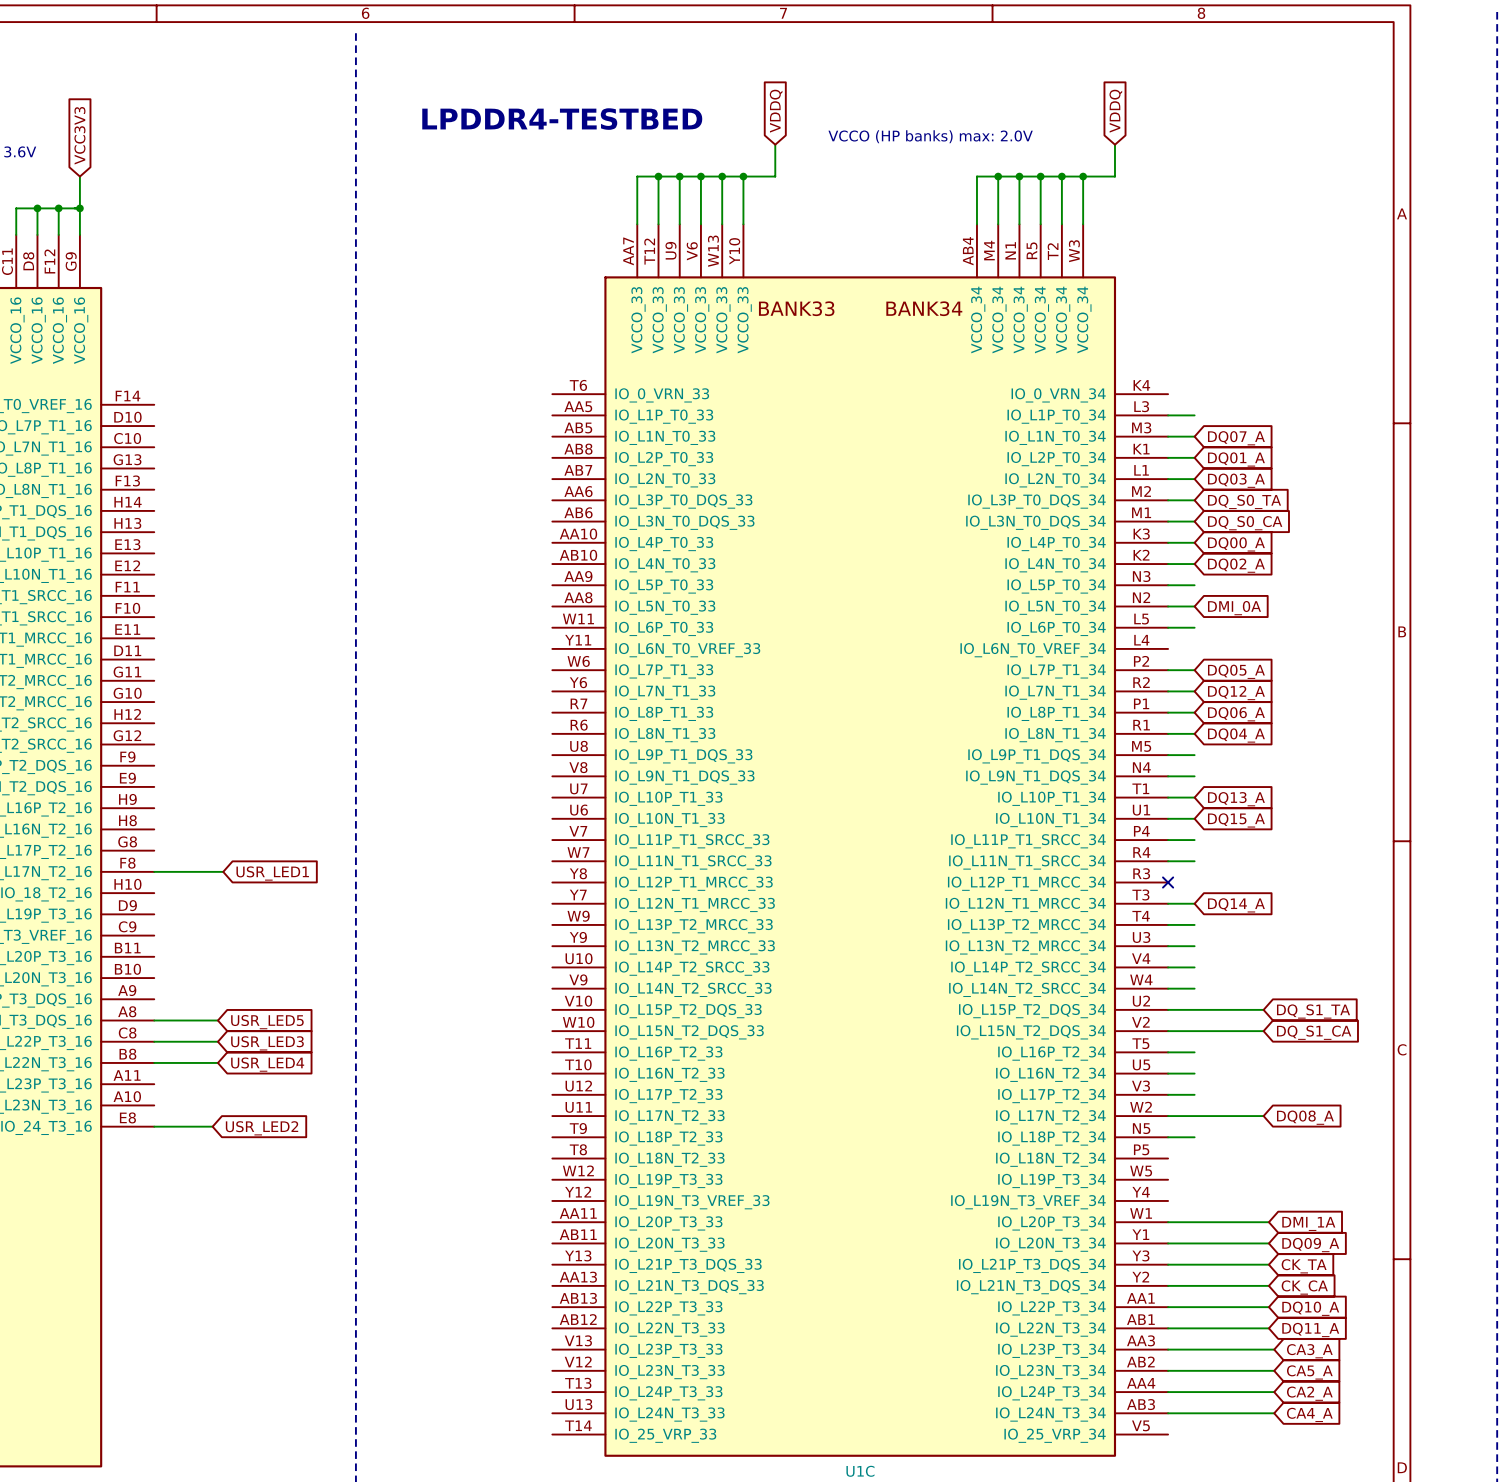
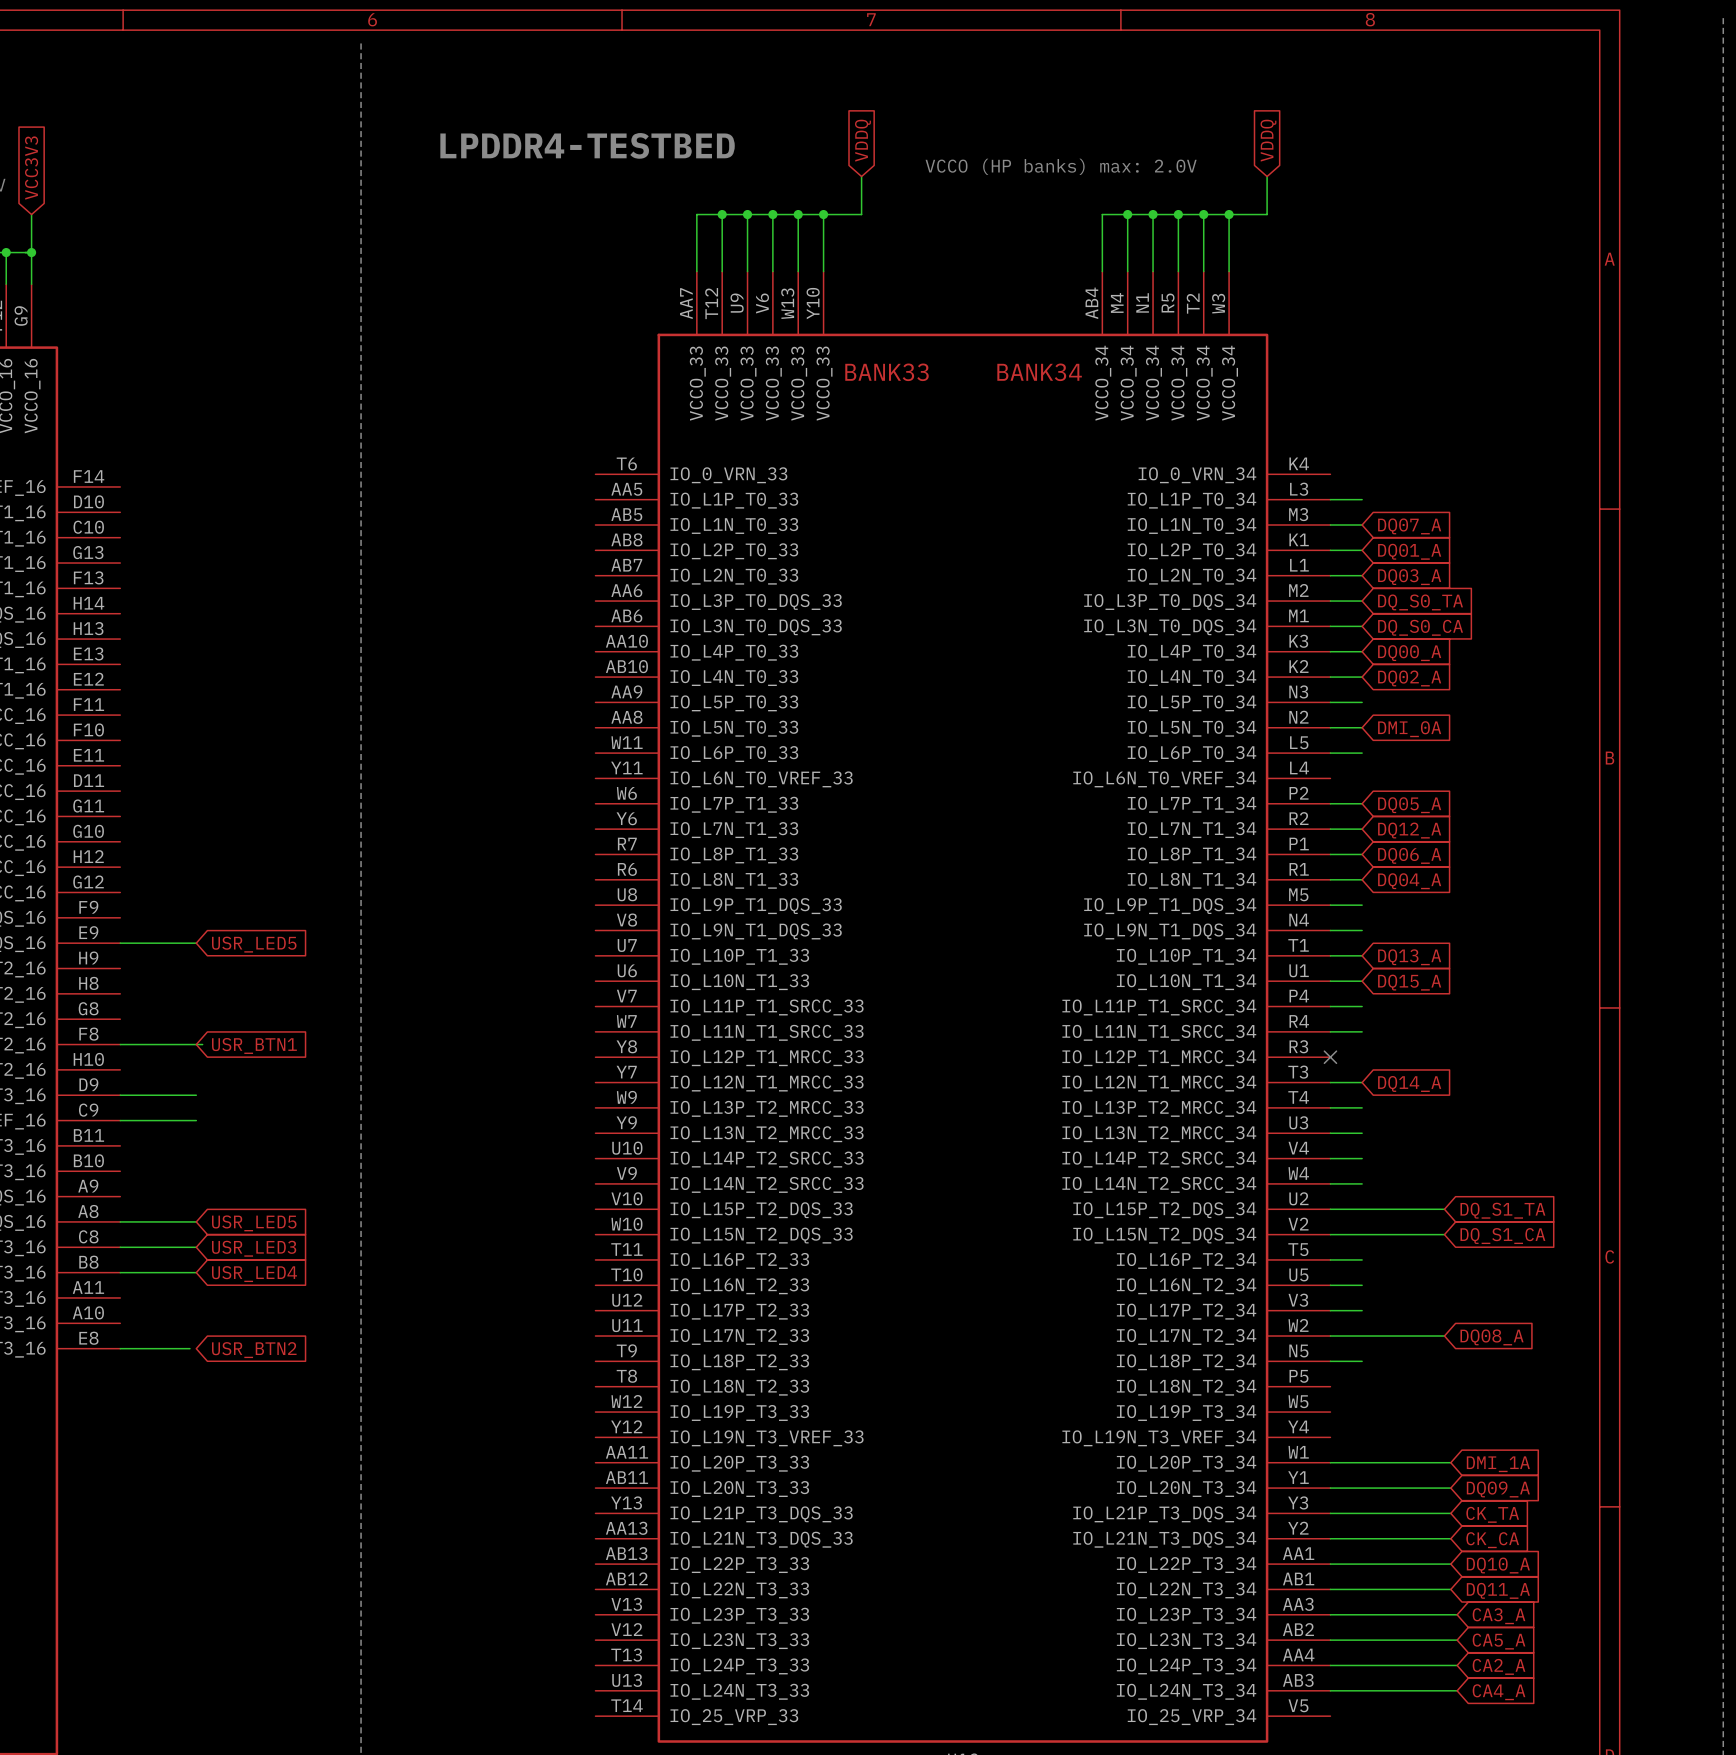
wire: none -> (120, 943) (196, 943)
global label: none -> USR_LED5 (254, 944)
global label: USR_LED1 (272, 873) -> USR_BTN1 (254, 1045)
wire: none -> (120, 1095) (196, 1095)
wire: none -> (120, 1120) (196, 1120)
global label: USR_LED2 (262, 1128) -> USR_BTN2 (254, 1350)

